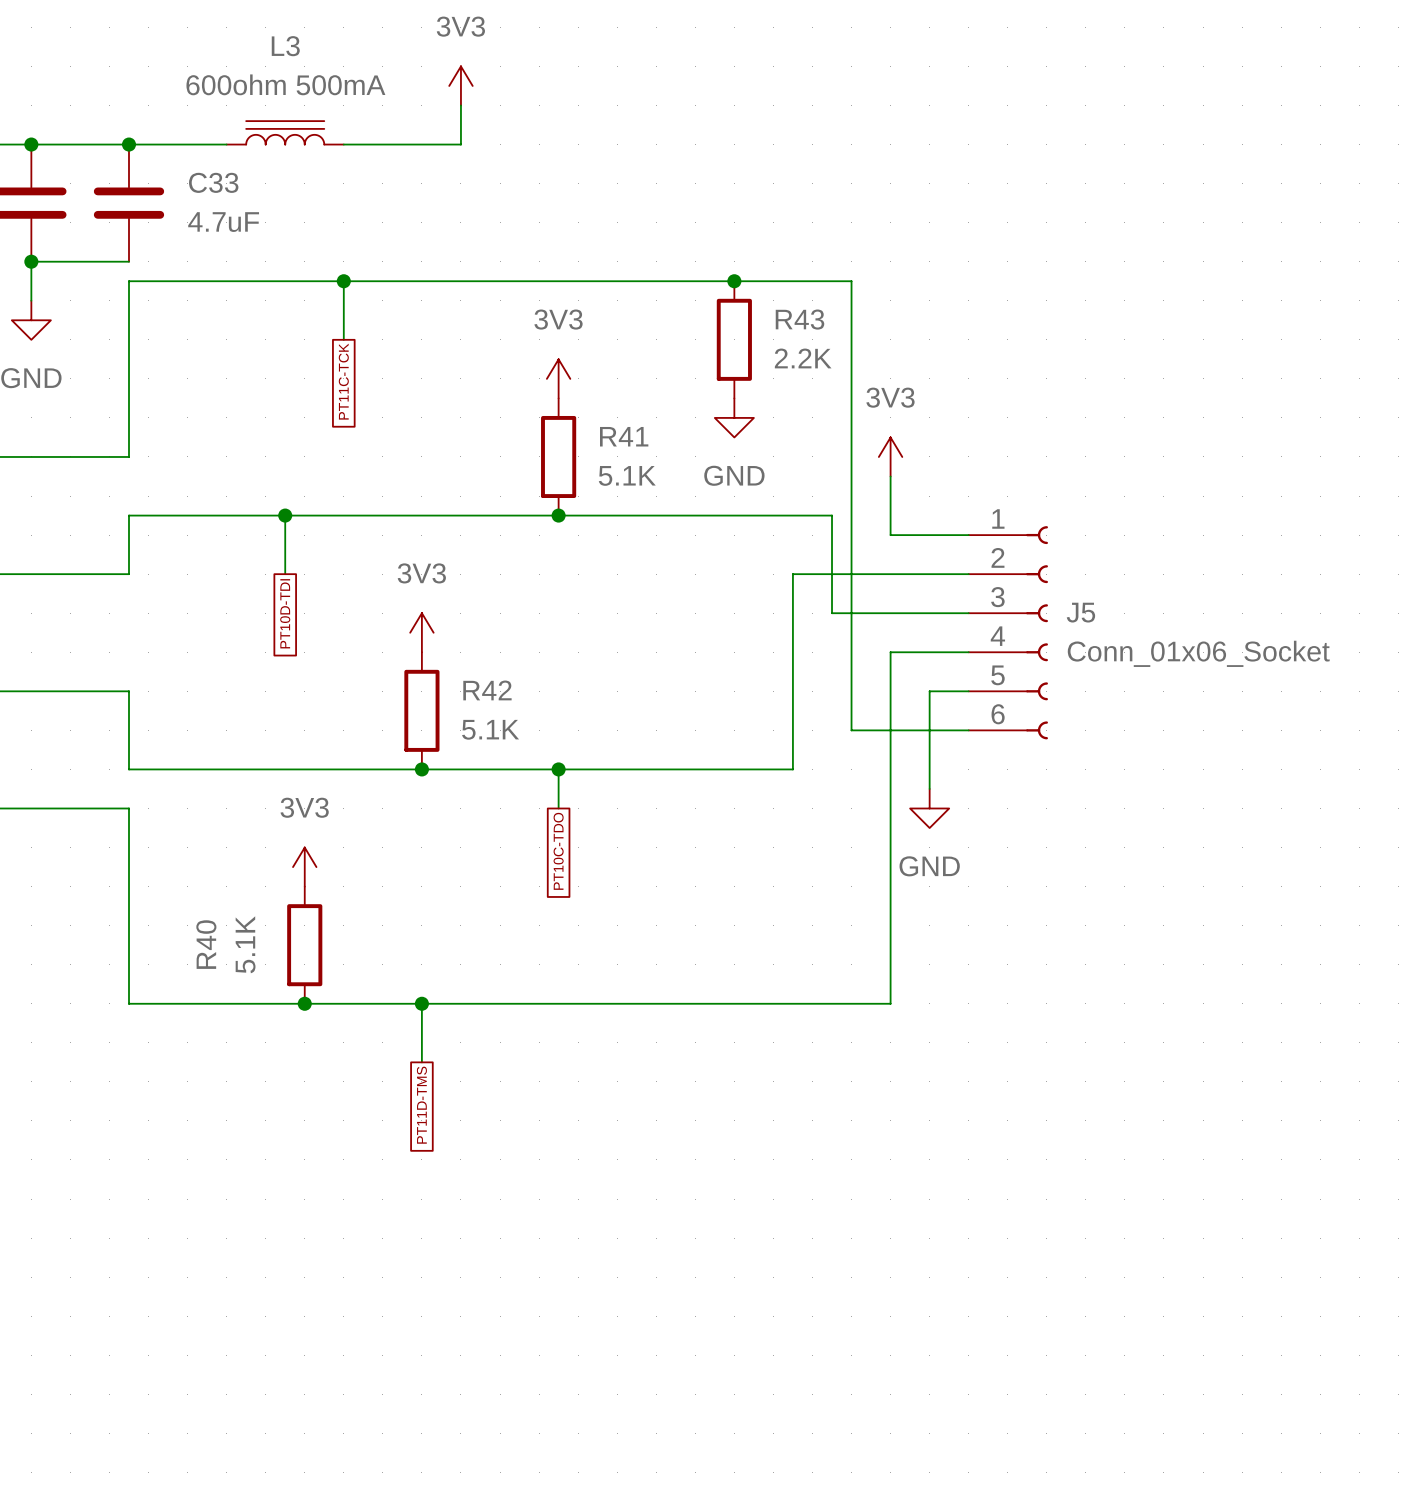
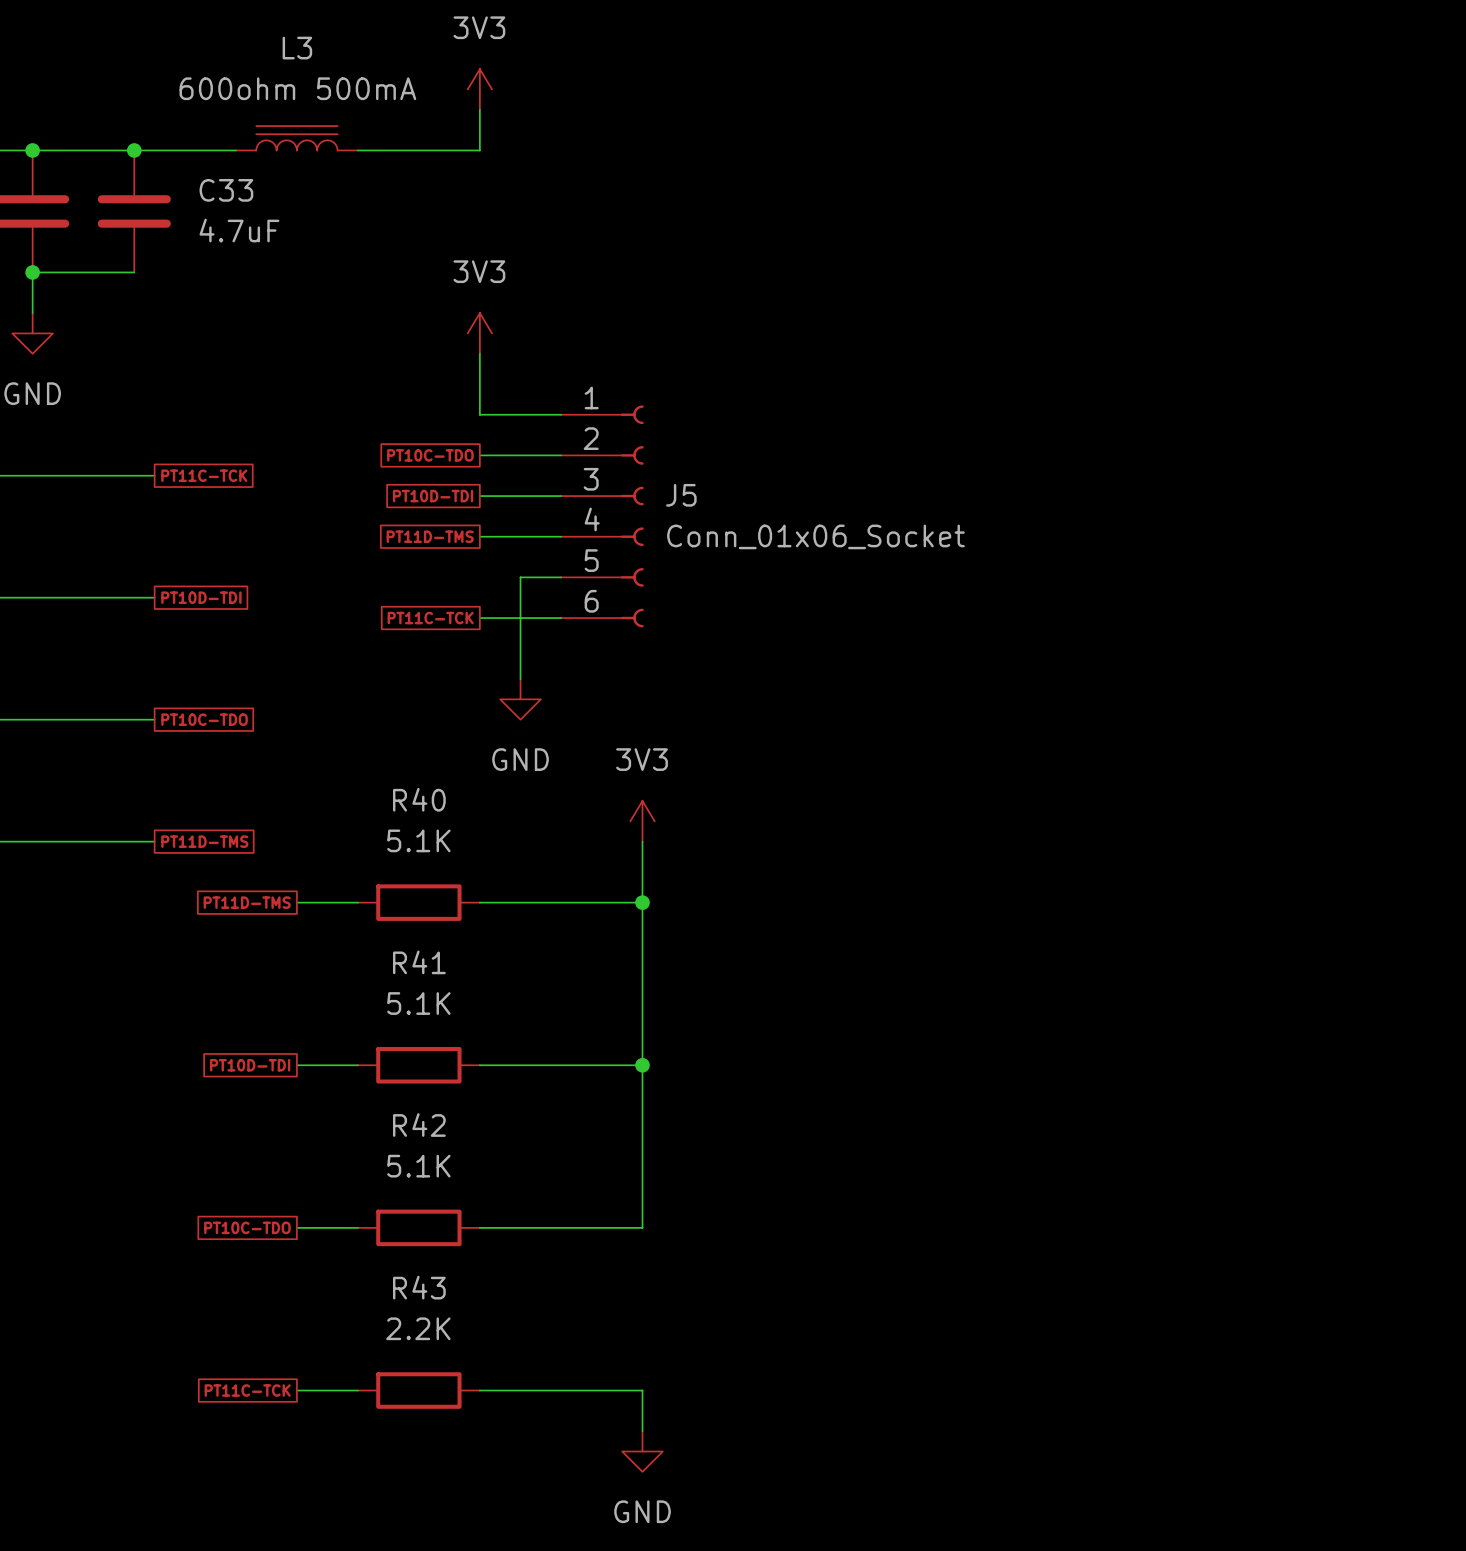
wire: (343, 281) (343, 339) -> none
junction: (343, 281) -> none
junction: (734, 281) -> none
R43 name position: R43 (799, 319) -> R43 (419, 1287)
wire: none -> (479, 353) (479, 414) (561, 414)
R43 rotation: 0° (734, 339) -> 90° clockwise (418, 1390)
R43 position: (734, 339) -> (418, 1390)
R43 value position: 2.2K (803, 358) -> 2.2K (418, 1328)
power symbol position: 3V3 (558, 378) -> 3V3 (479, 333)
global label: PT11C-TCK (343, 381) -> PT10C-TDO (430, 455)
power symbol: GND (734, 417) -> none
R41 name position: R41 (624, 436) -> R41 (419, 962)
wire: none -> (479, 455) (561, 455)
wire: (129, 456) (129, 281) (851, 281) (851, 730) (968, 730) -> (134, 475) (154, 475)
global label: none -> PT11C-TCK (204, 475)
R41 rotation: 0° (558, 456) -> 90° clockwise (418, 1065)
R41 position: (558, 456) -> (418, 1065)
power symbol: 3V3 (890, 456) -> none
R41 value position: 5.1K (627, 475) -> 5.1K (418, 1003)
global label: none -> PT10D-TDI (433, 496)
wire: none -> (479, 496) (561, 496)
wire: (890, 476) (890, 535) (968, 535) -> none
wire: (285, 515) (285, 574) -> none
junction: (285, 515) -> none
global label: none -> PT11D-TMS (430, 536)
wire: (460, 515) (129, 515) (129, 574) -> (154, 597) (134, 597)
wire: (539, 515) (832, 515) (832, 613) (968, 613) -> none
junction: (558, 515) -> none
wire: none -> (561, 577) (520, 577) (520, 679)
global label: none -> PT10D-TDI (201, 597)
wire: (968, 574) (792, 574) (792, 769) (129, 769) (129, 691) -> (154, 719) (134, 719)
global label: none -> PT11C-TCK (430, 618)
wire: none -> (479, 618) (561, 618)
global label: PT10D-TDI (285, 613) -> none
power symbol: 3V3 (421, 632) -> none
J5 position: (1008, 632) -> (602, 516)
wire: (968, 652) (890, 652) (890, 1003) (129, 1003) (129, 808) -> (154, 841) (134, 841)
power symbol: none -> GND (520, 699)
R42 name position: R42 (487, 690) -> R42 (419, 1125)
global label: none -> PT10C-TDO (204, 719)
wire: (968, 691) (929, 691) (929, 788) -> none
R42 rotation: 0° (421, 710) -> 90° clockwise (418, 1227)
R42 position: (421, 710) -> (418, 1227)
R42 value position: 5.1K (490, 729) -> 5.1K (418, 1166)
junction: (421, 769) -> none
wire: (558, 769) (558, 808) -> none
junction: (558, 769) -> none
power symbol: none -> 3V3 (642, 821)
global label: none -> PT11D-TMS (204, 841)
wire: none -> (642, 841) (642, 1227) (479, 1227)
power symbol: GND (929, 808) -> none
global label: PT10C-TDO (558, 851) -> none
global label: none -> PT11D-TMS (247, 902)
wire: none -> (296, 902) (357, 902)
power symbol: 3V3 (304, 867) -> none
wire: none -> (479, 902) (642, 902)
junction: none -> (642, 902)
R40 rotation: 0° (304, 945) -> 90° clockwise (418, 902)
R40 position: (304, 945) -> (418, 902)
junction: (304, 1003) -> none
wire: (421, 1003) (421, 1062) -> none
junction: (421, 1003) -> none
global label: none -> PT10D-TDI (250, 1065)
wire: none -> (296, 1065) (357, 1065)
wire: none -> (479, 1065) (642, 1065)
junction: none -> (642, 1065)
global label: PT11D-TMS (421, 1105) -> none
global label: none -> PT10C-TDO (247, 1227)
wire: none -> (296, 1227) (357, 1227)
global label: none -> PT11C-TCK (247, 1390)
wire: none -> (296, 1390) (357, 1390)
wire: none -> (479, 1390) (642, 1390) (642, 1431)
power symbol: none -> GND (642, 1451)

